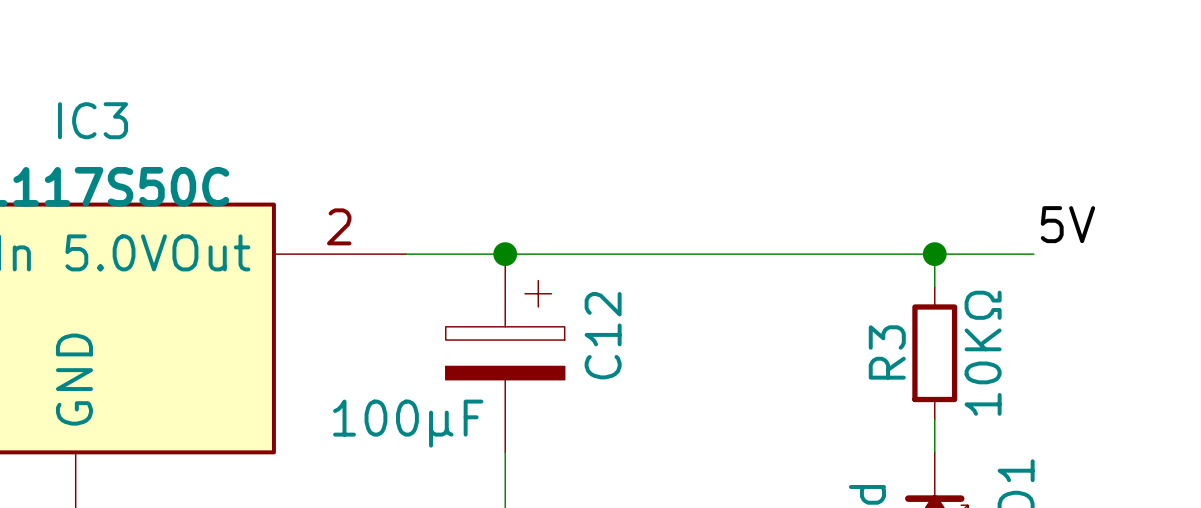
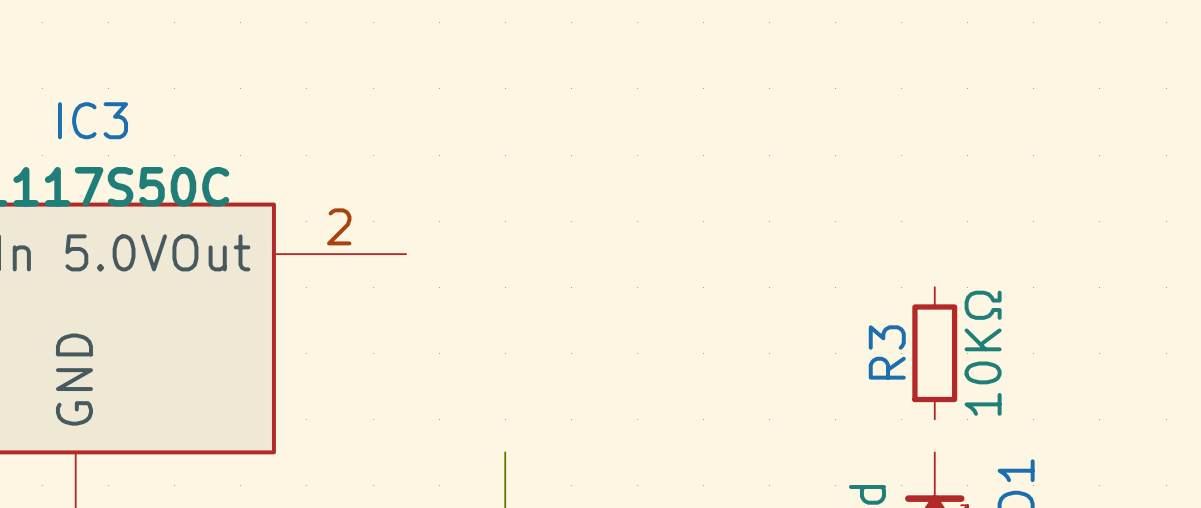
label: 5V (1067, 224) -> none
wire: (406, 254) (1033, 254) -> none
junction: (505, 254) -> none
wire: (934, 254) (934, 287) -> none
junction: (934, 254) -> none
C12: (505, 353) -> none
wire: (934, 419) (934, 452) -> none

